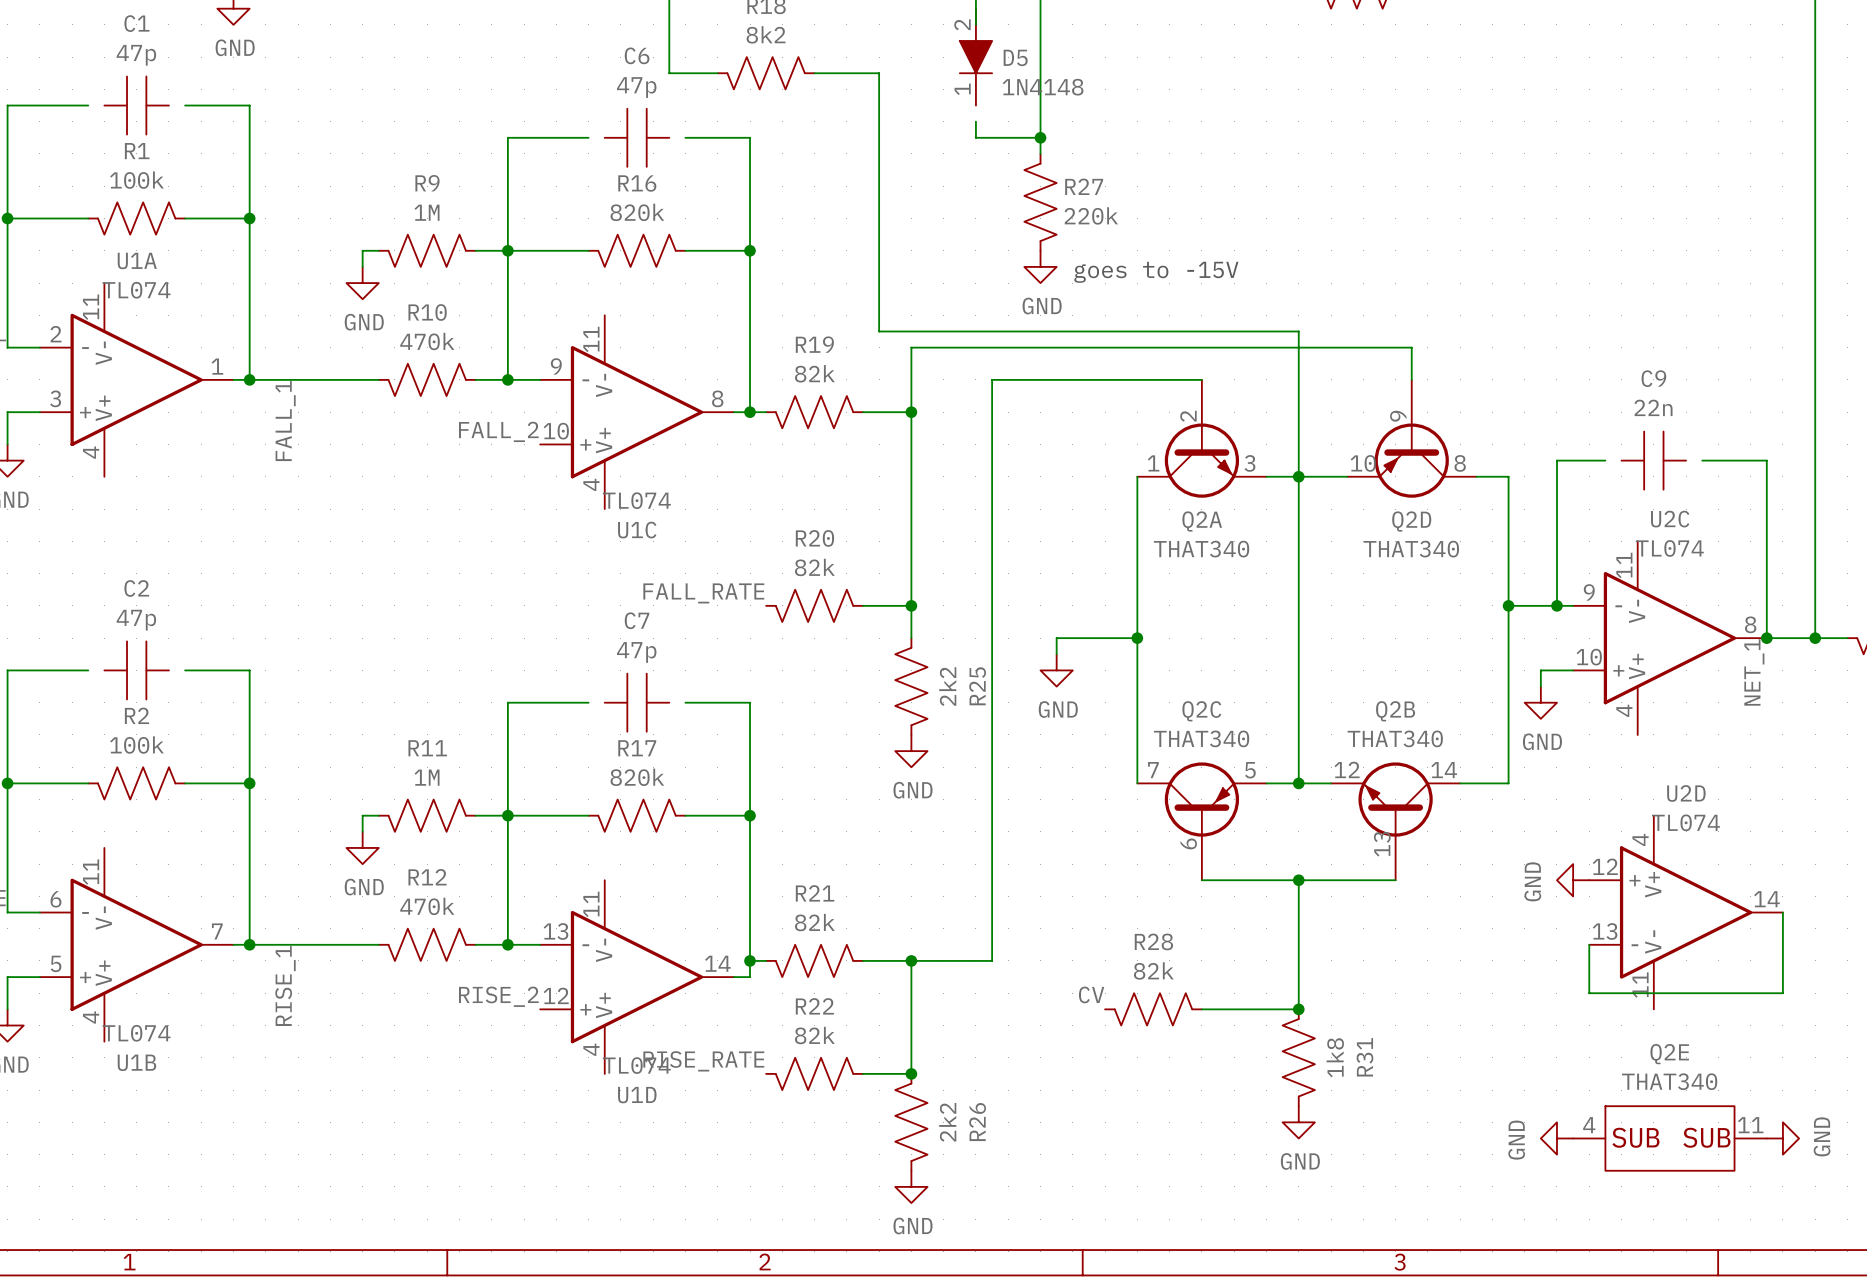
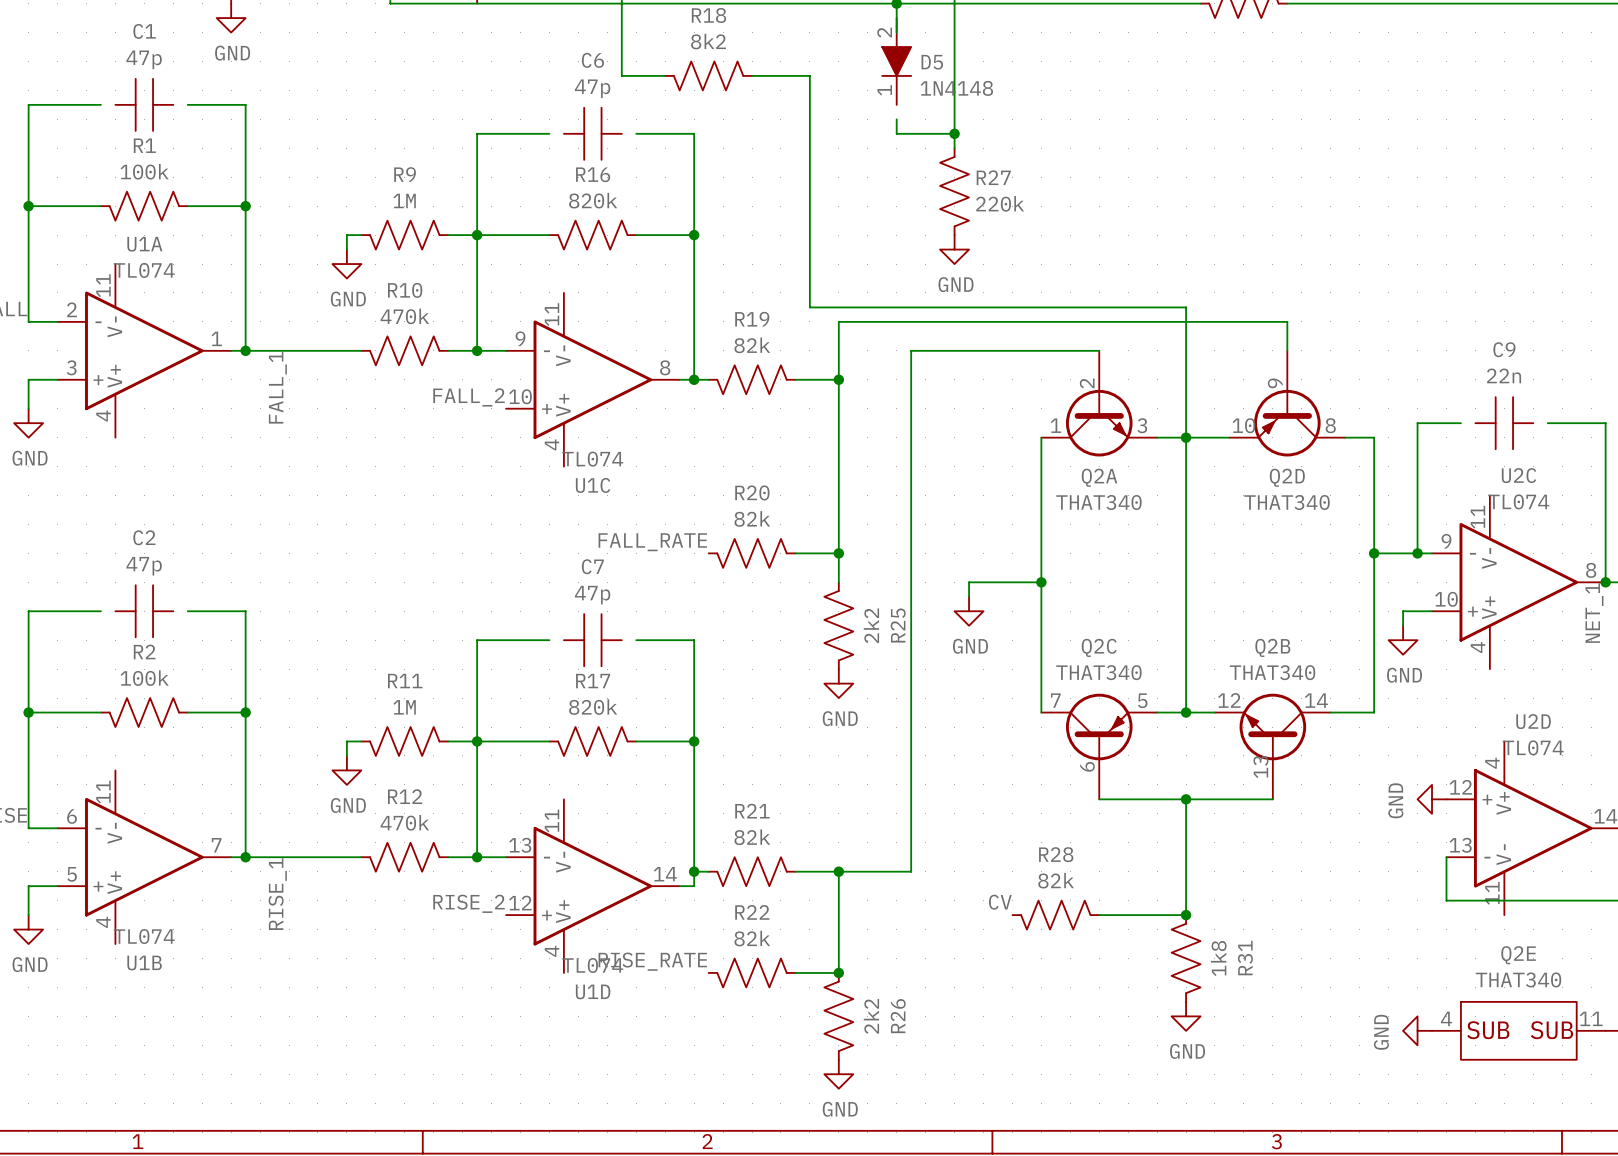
text: goes to -15V (1156, 272) -> none

